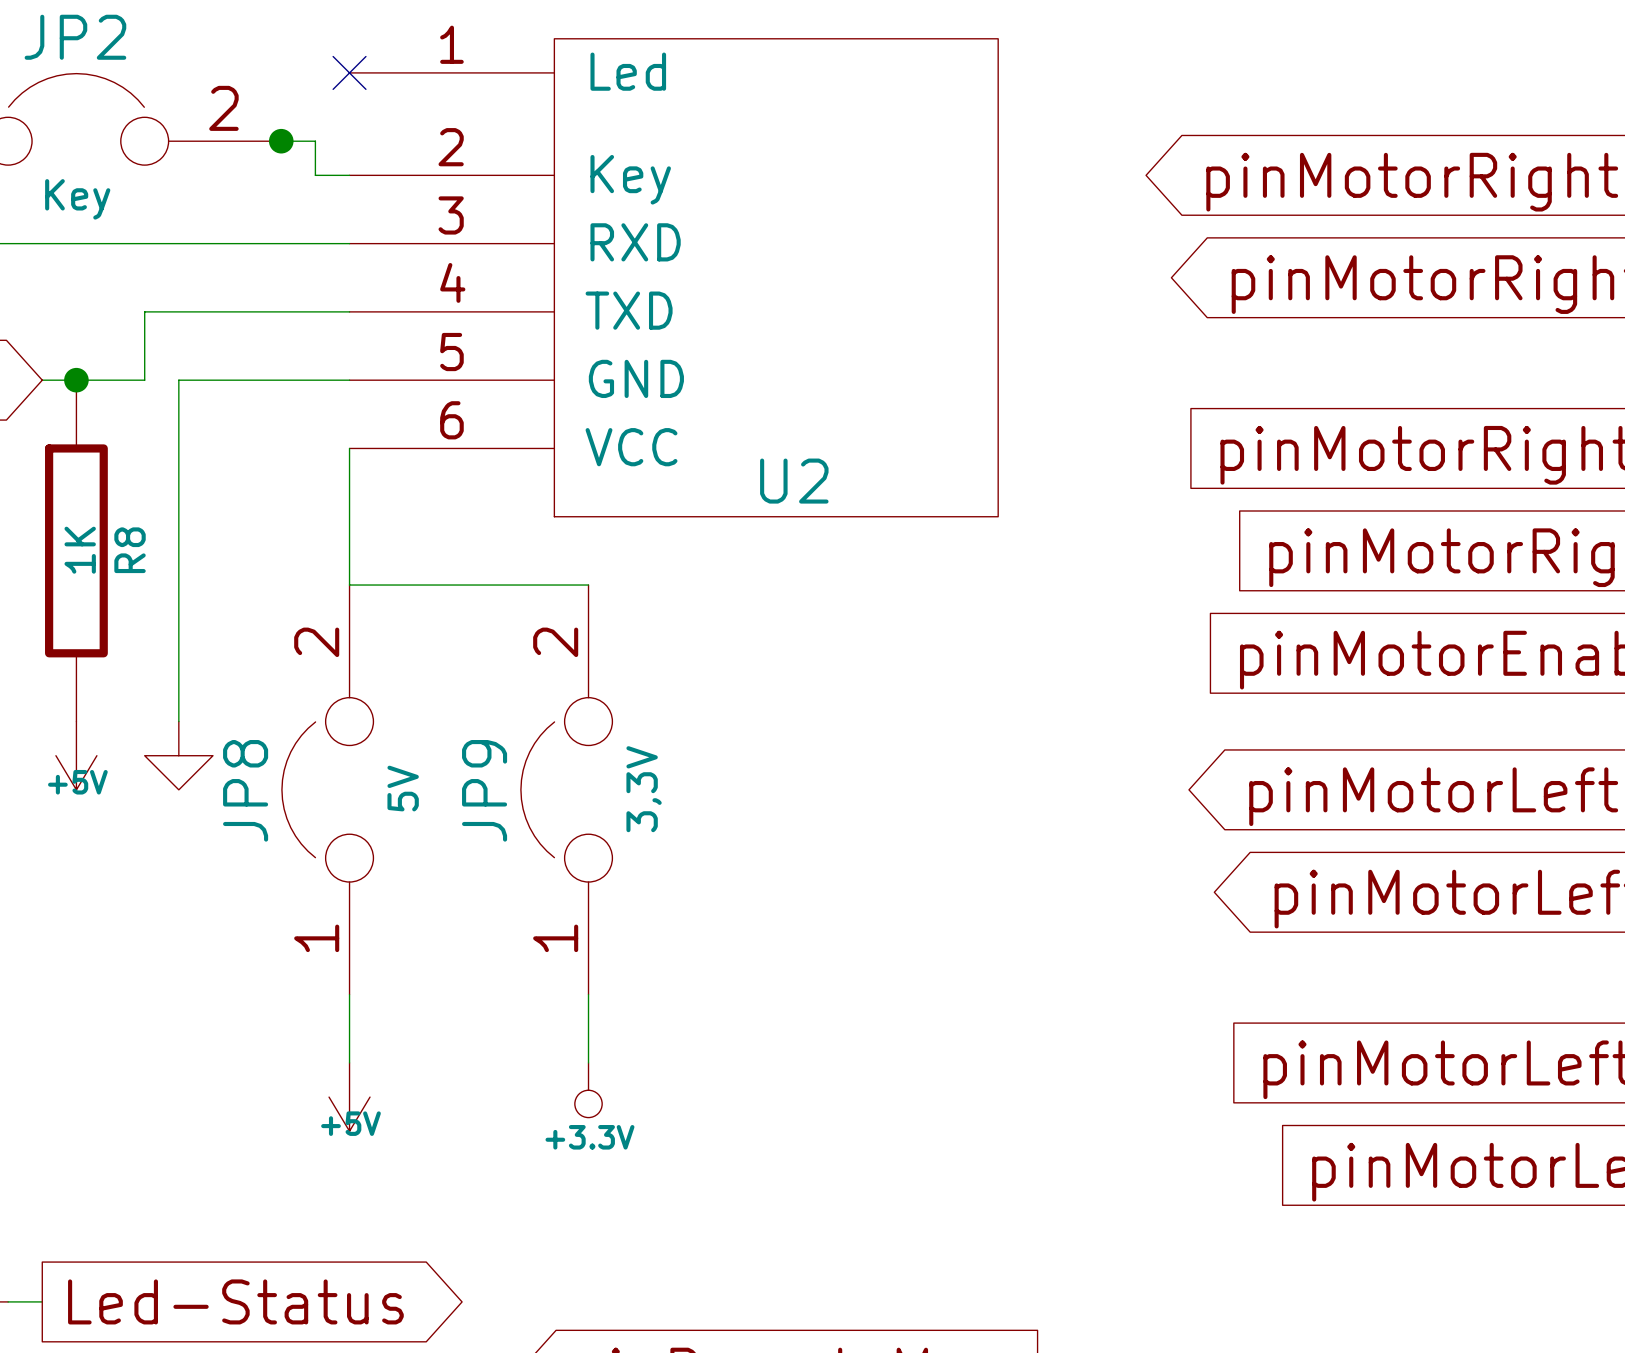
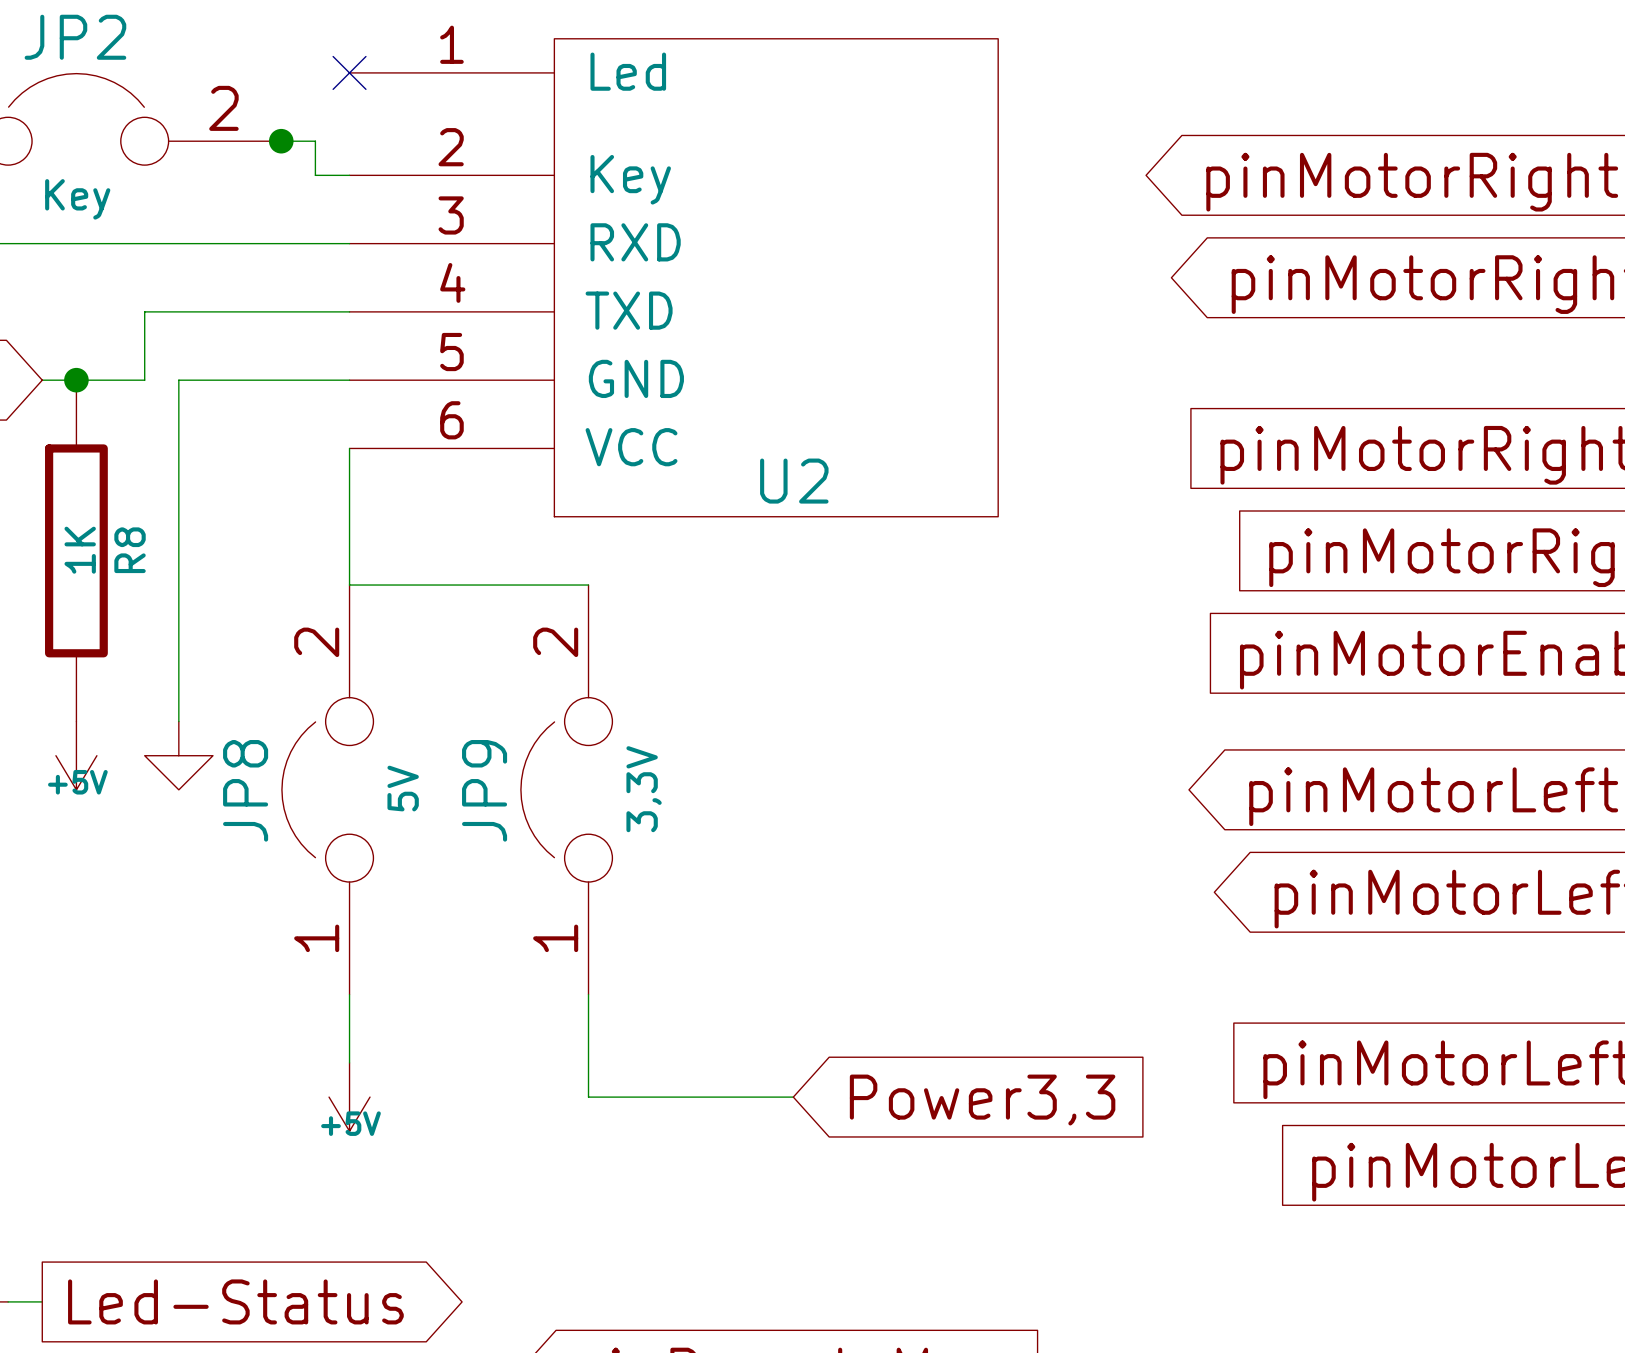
wire: none -> (588, 1062) (588, 1097) (793, 1097)
power symbol: +3.3V (588, 1090) -> none
global label: none -> Power3,3 (982, 1100)

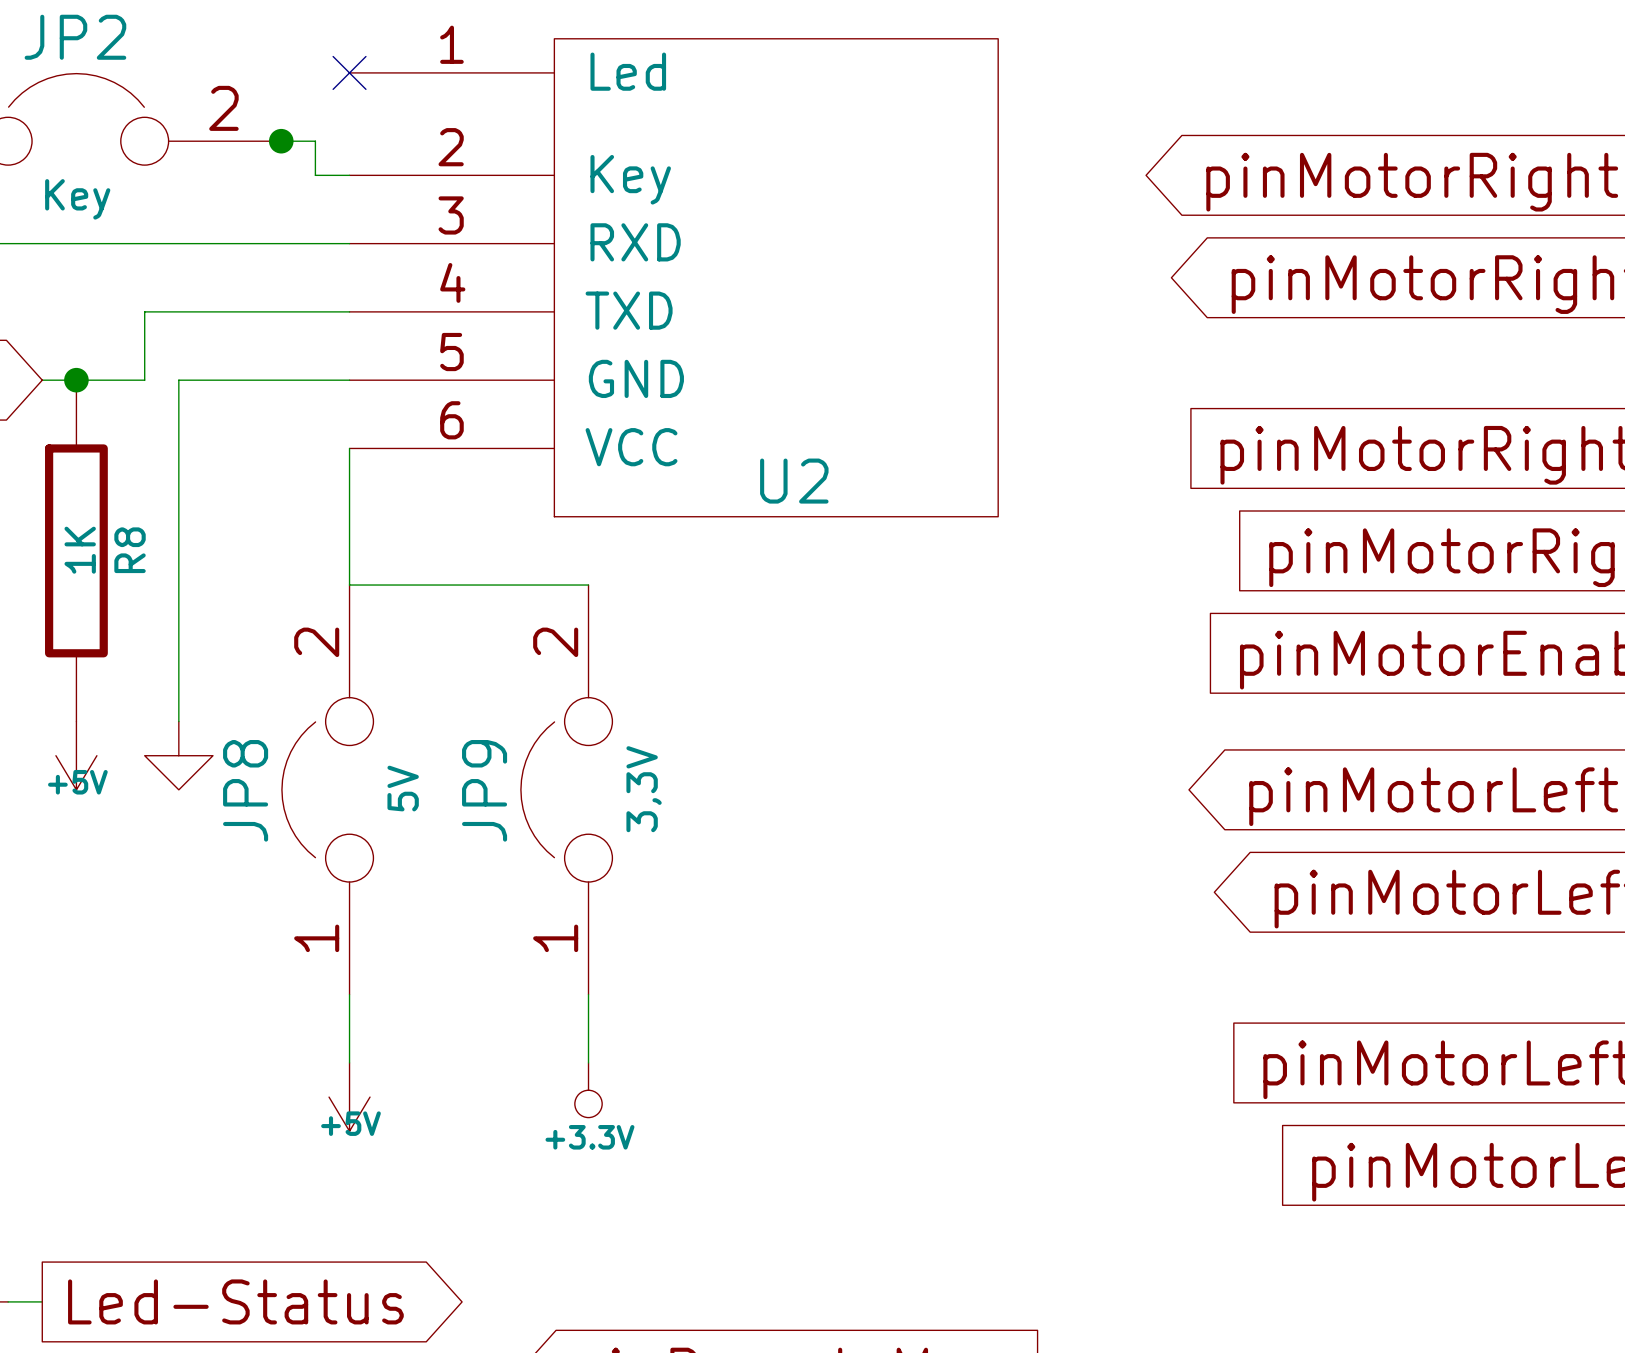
wire: (588, 1062) (588, 1097) (793, 1097) -> none
power symbol: none -> +3.3V (588, 1090)
global label: Power3,3 (982, 1100) -> none

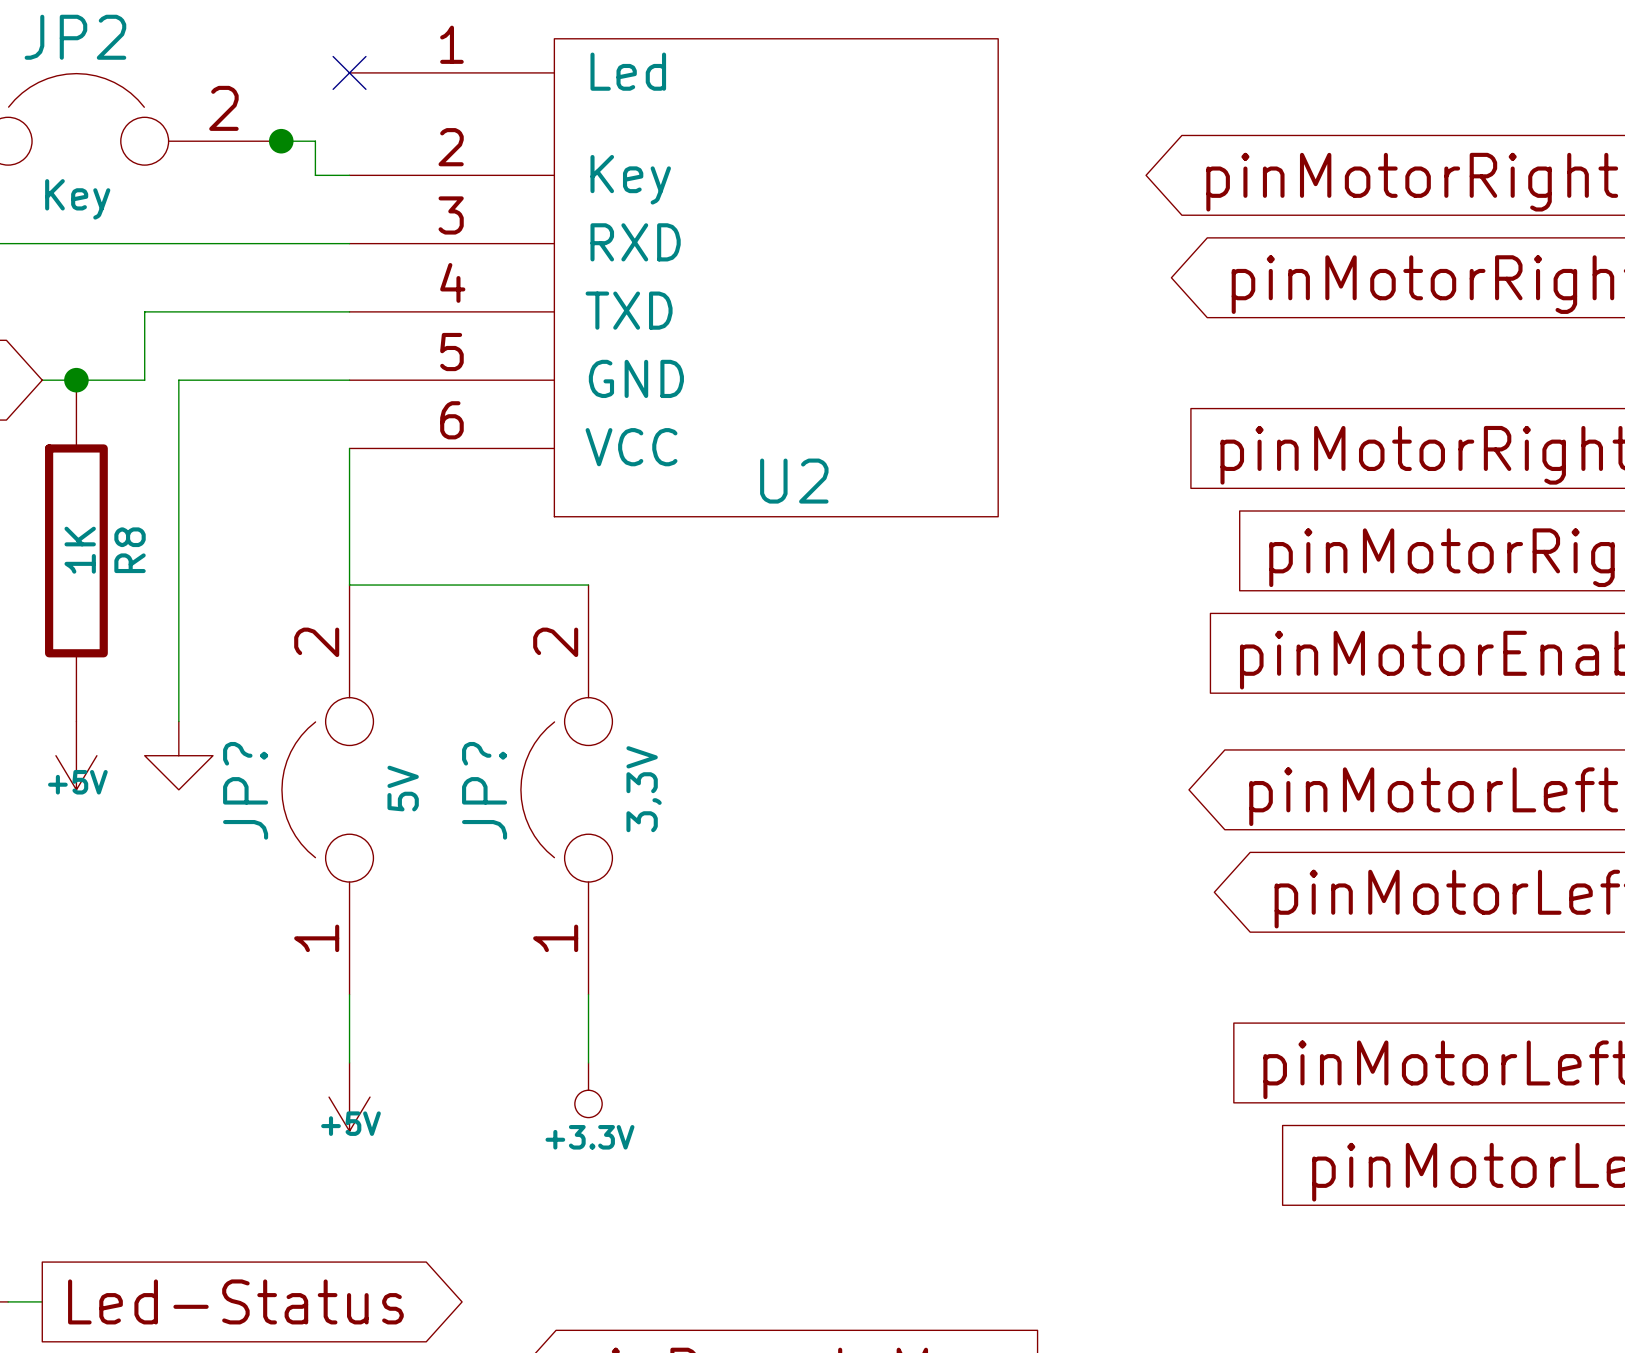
JP8 name: JP8 (245, 790) -> JP? (245, 790)
JP9 name: JP9 (484, 790) -> JP? (484, 790)

